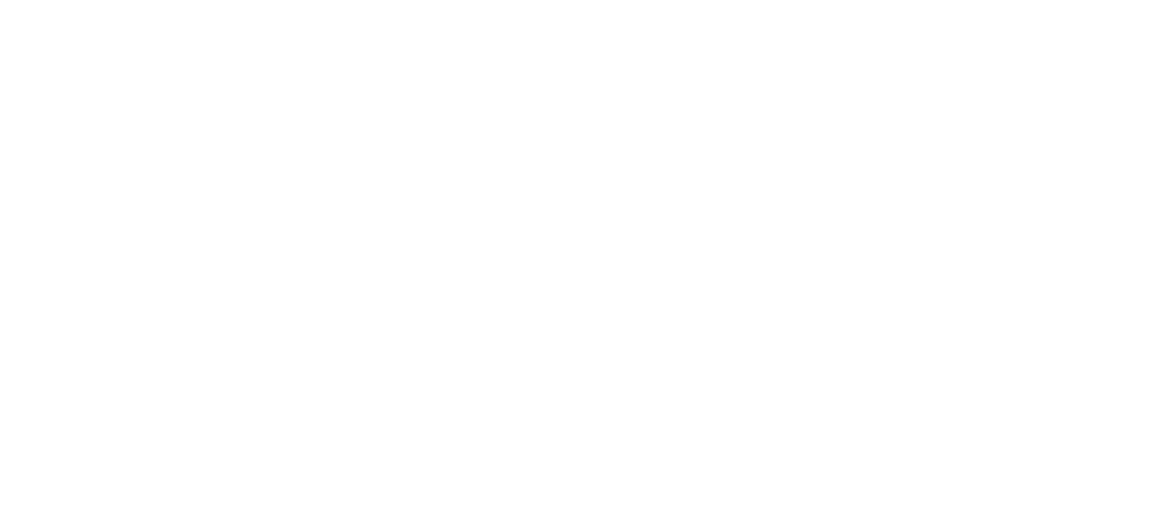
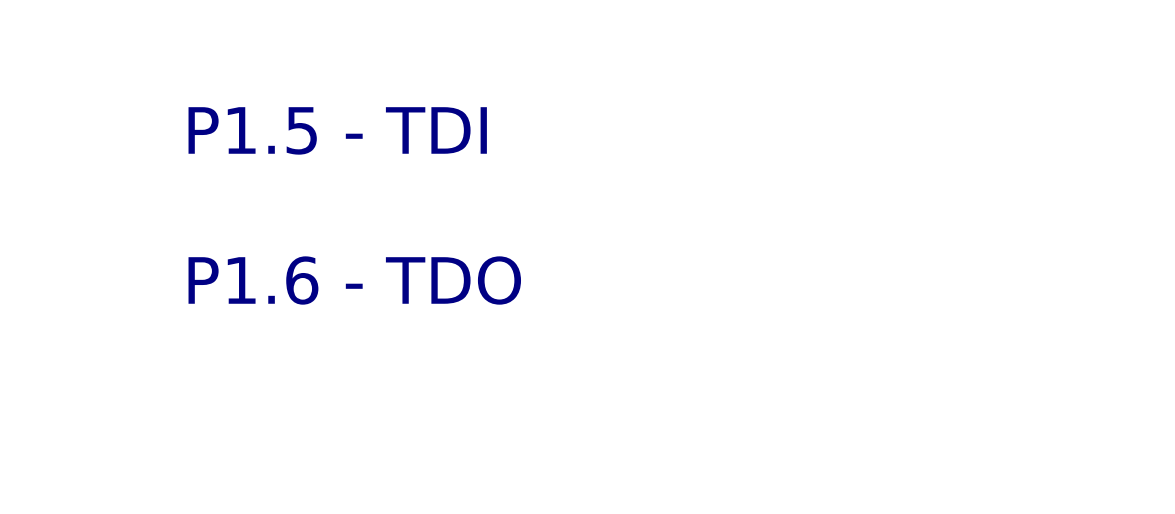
text: none -> P1.5 - TDI (337, 130)
text: none -> P1.6 - TDO (354, 280)

